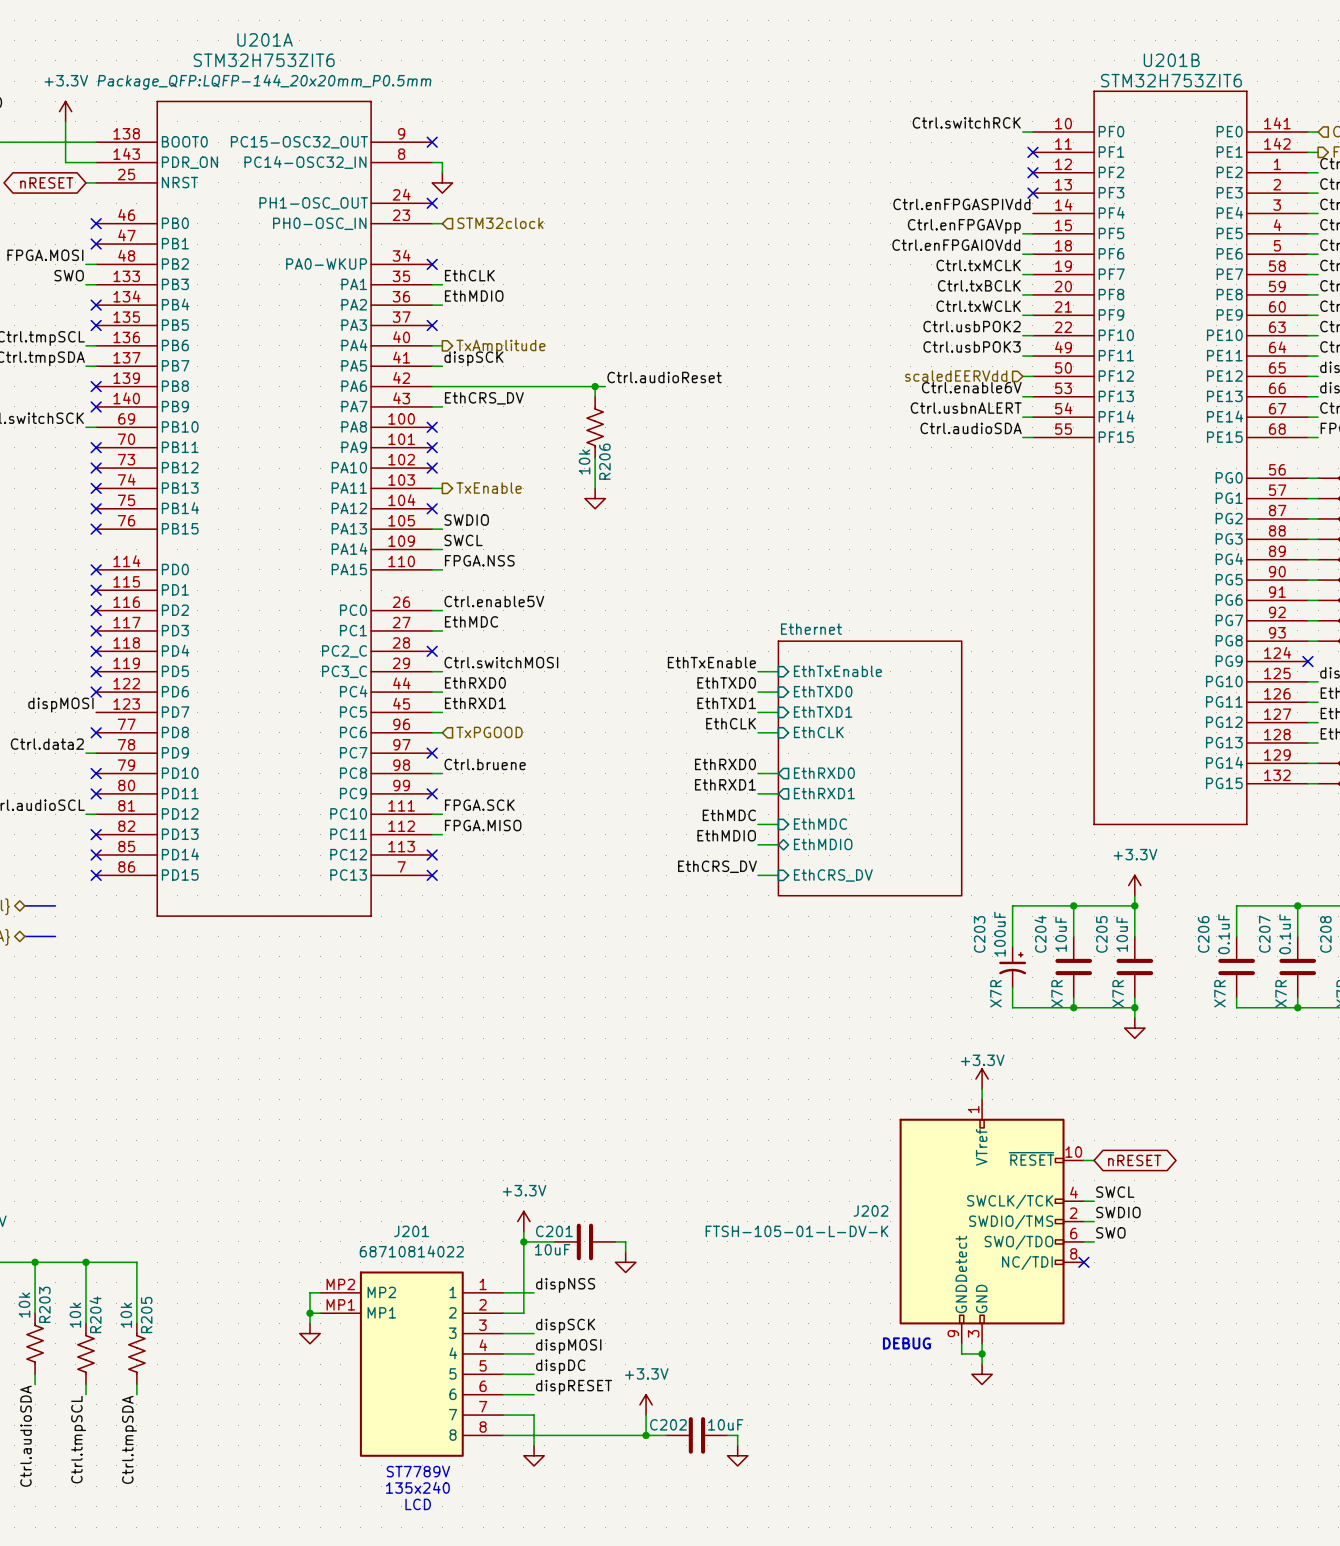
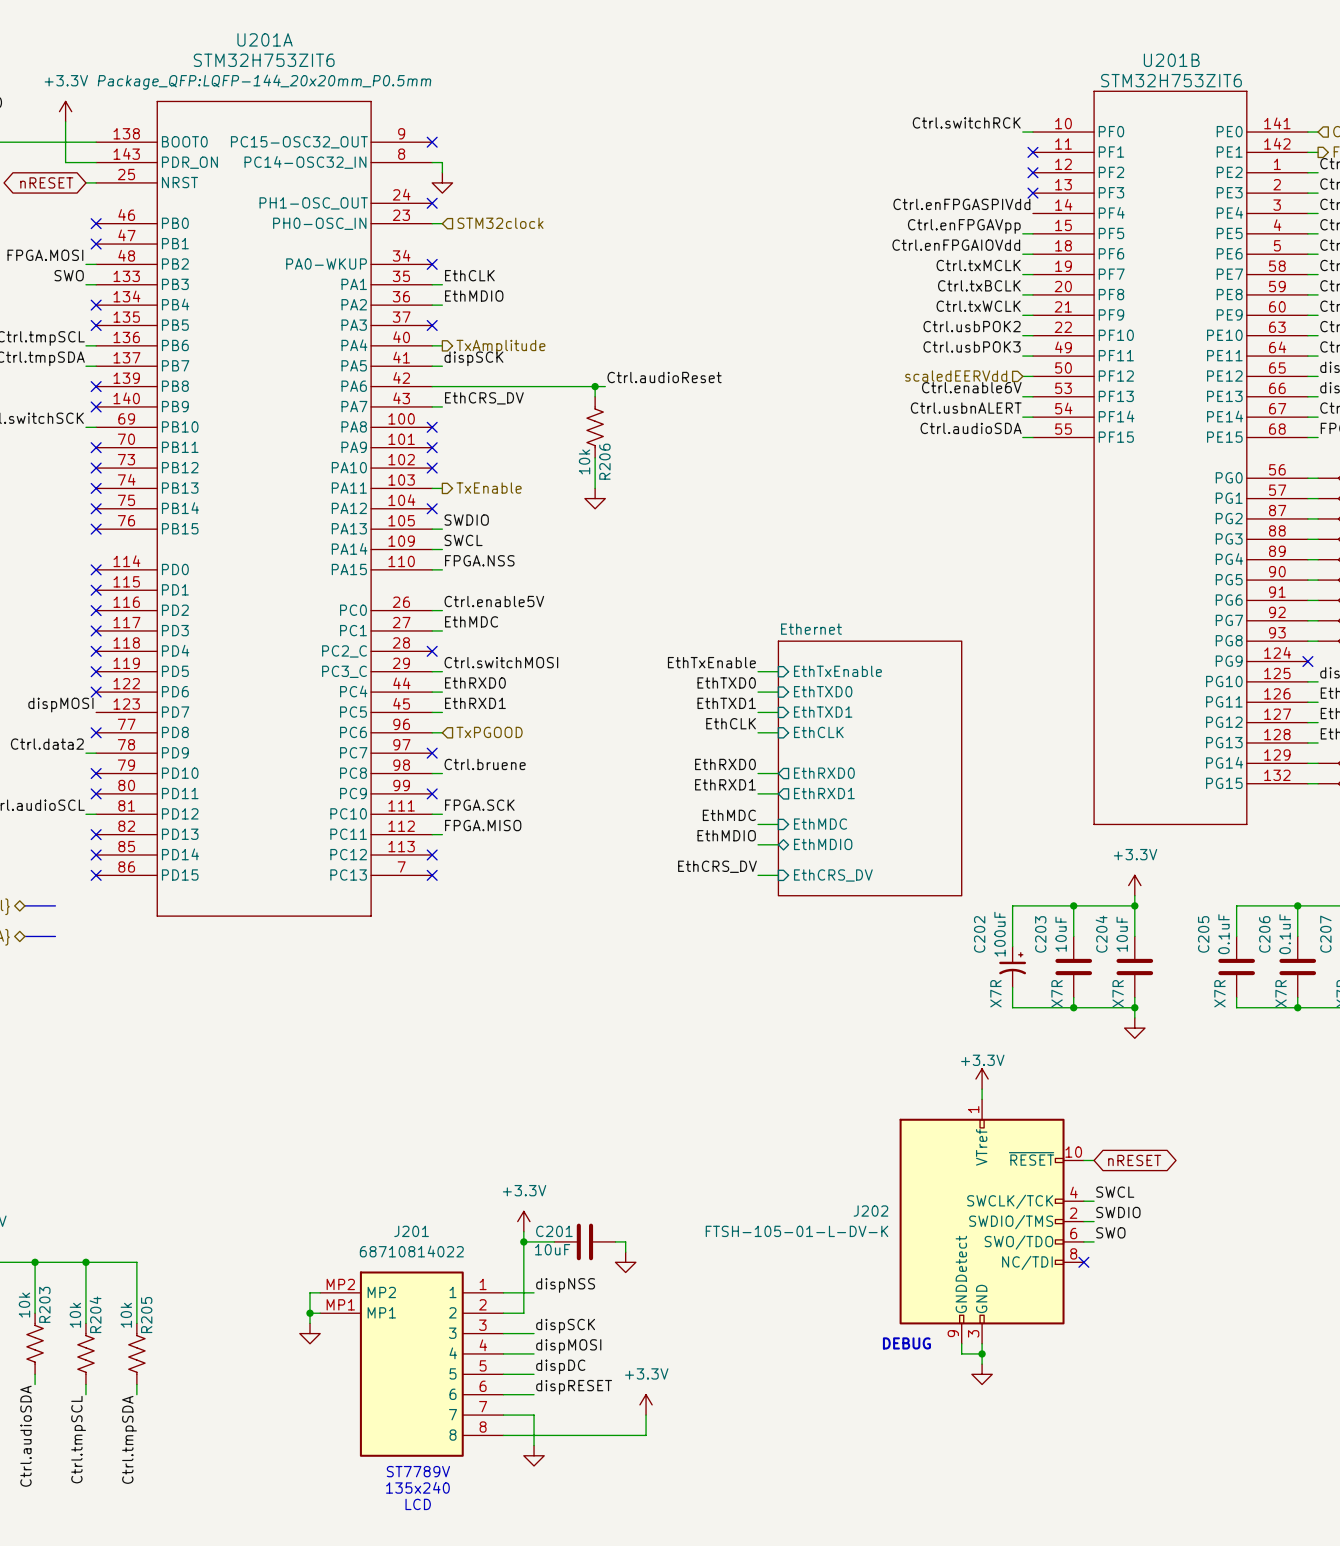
C203 name: C203 (979, 934) -> C202 (979, 934)
C204 name: C204 (1040, 934) -> C203 (1040, 934)
C205 name: C205 (1101, 934) -> C204 (1101, 934)
C206 name: C206 (1203, 934) -> C205 (1203, 934)
C207 name: C207 (1264, 934) -> C206 (1264, 934)
C208 name: C208 (1325, 934) -> C207 (1325, 934)
wire: (646, 1435) (666, 1435) -> none
junction: (646, 1435) -> none
C202: 10uF (696, 1435) -> none
wire: (727, 1435) (737, 1435) (737, 1445) -> none
power symbol: (737, 1455) -> none

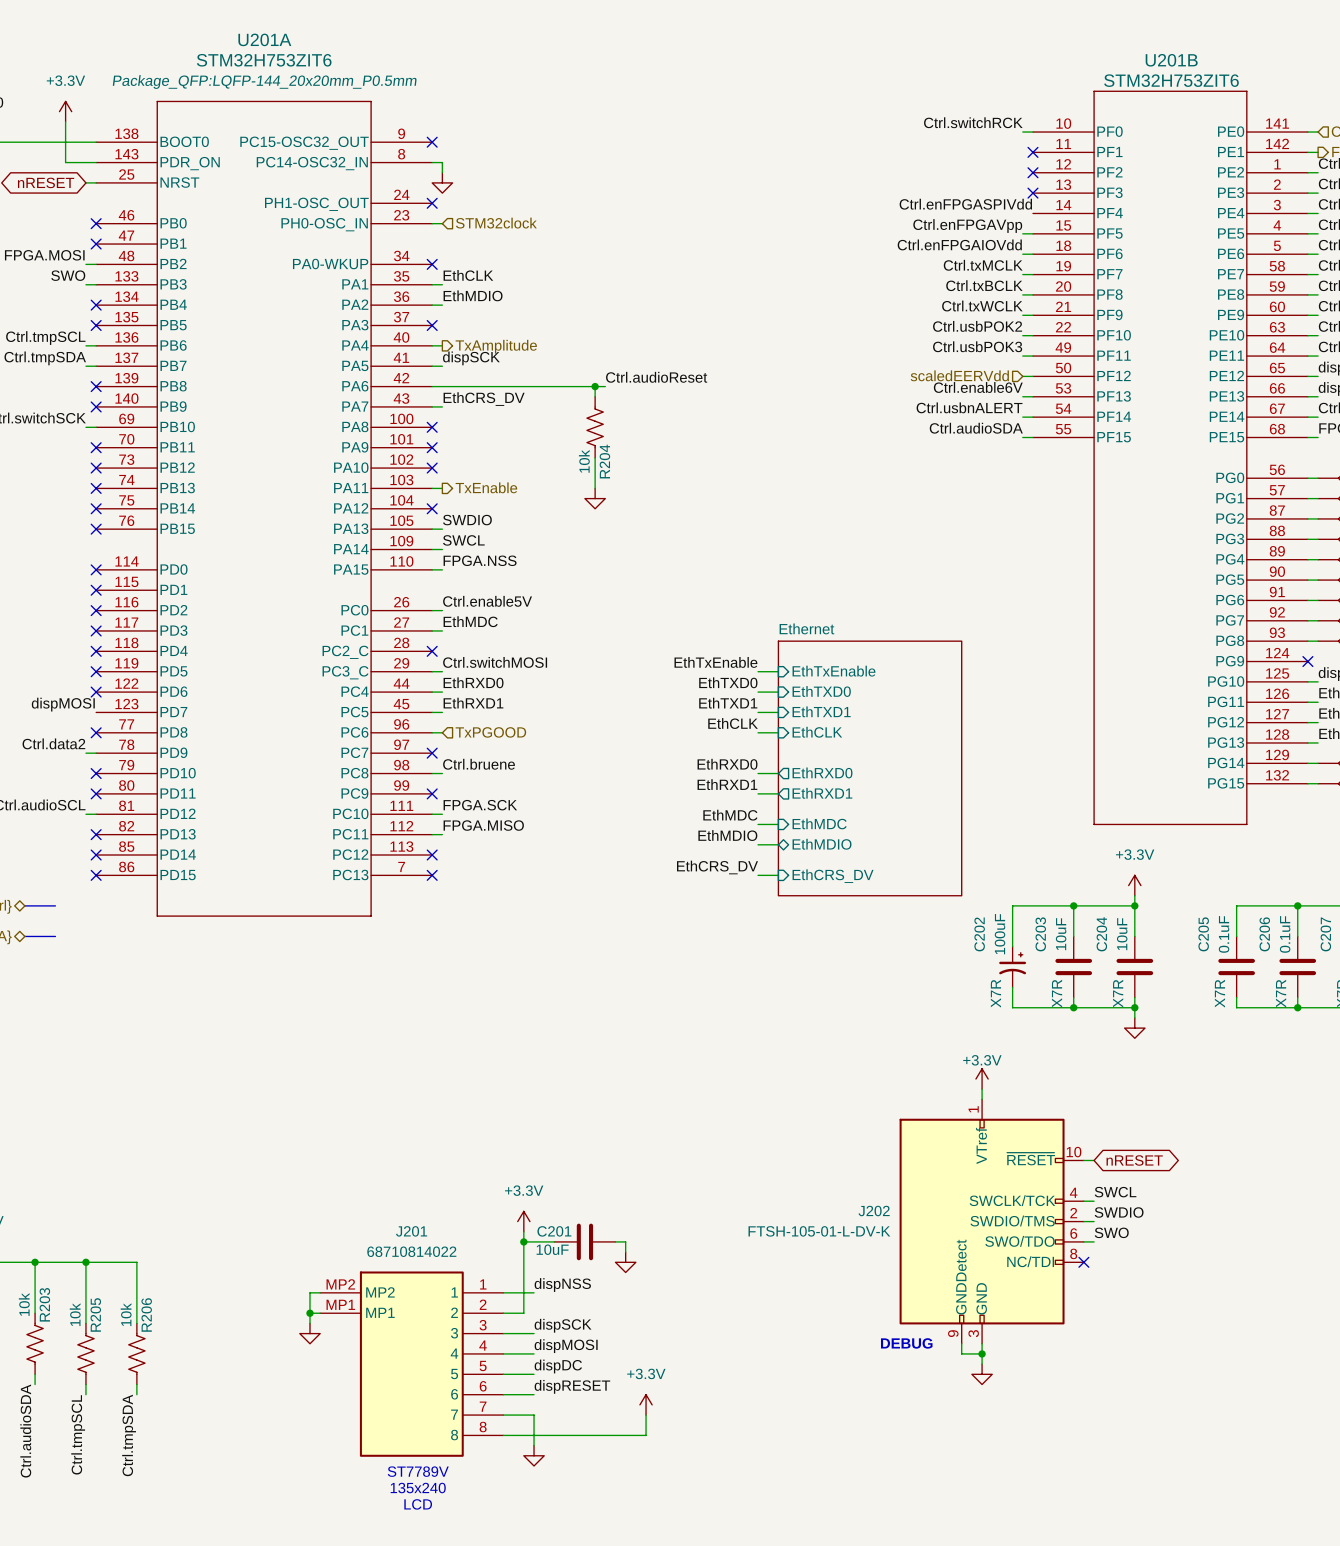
R206 name: R206 (604, 461) -> R204 (604, 461)
R204 name: R204 (95, 1314) -> R205 (95, 1314)
R205 name: R205 (146, 1315) -> R206 (146, 1314)

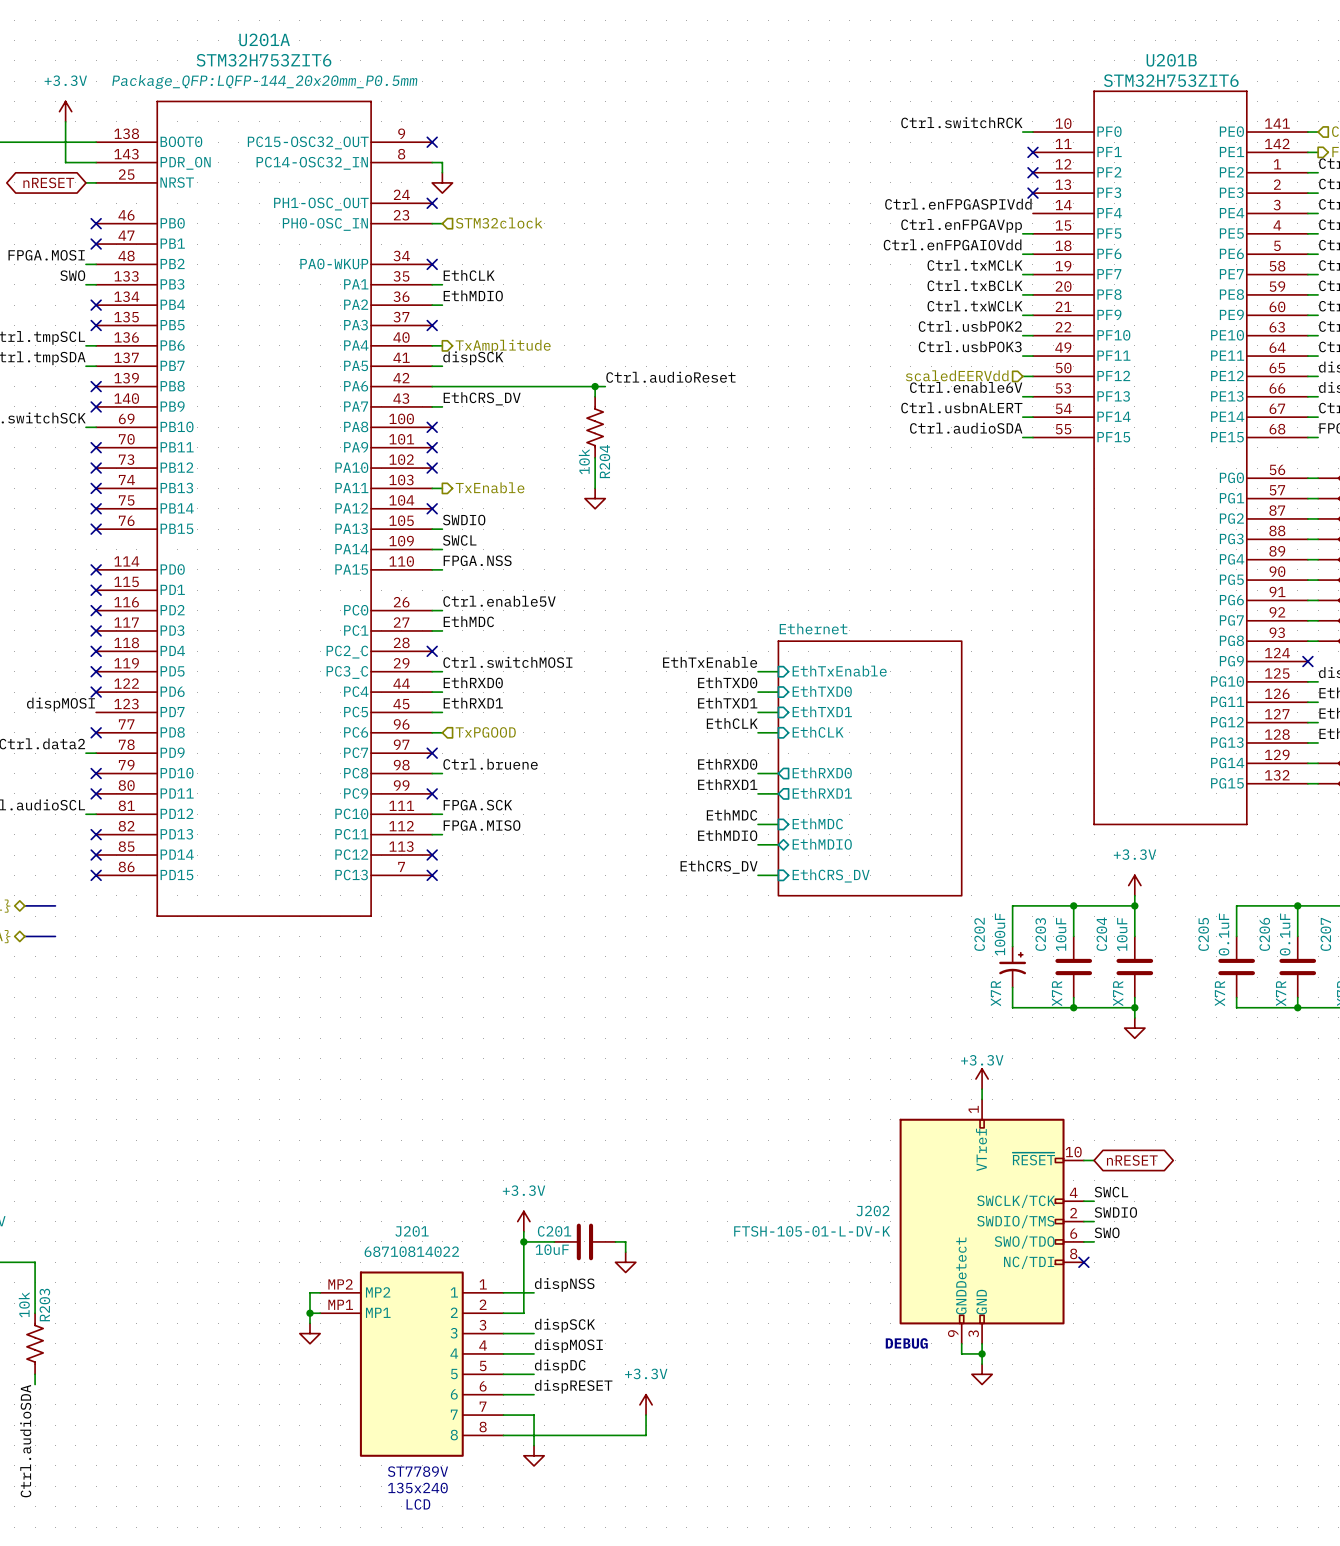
wire: (35, 1262) (136, 1262) (136, 1323) -> none
junction: (35, 1262) -> none
wire: (85, 1262) (85, 1323) -> none
junction: (85, 1262) -> none
R205: 10k (85, 1353) -> none
R206: 10k (136, 1353) -> none
wire: (85, 1384) (85, 1394) -> none
wire: (136, 1384) (136, 1394) -> none
label: Ctrl.tmpSCL (78, 1434) -> none
label: Ctrl.tmpSDA (129, 1435) -> none

